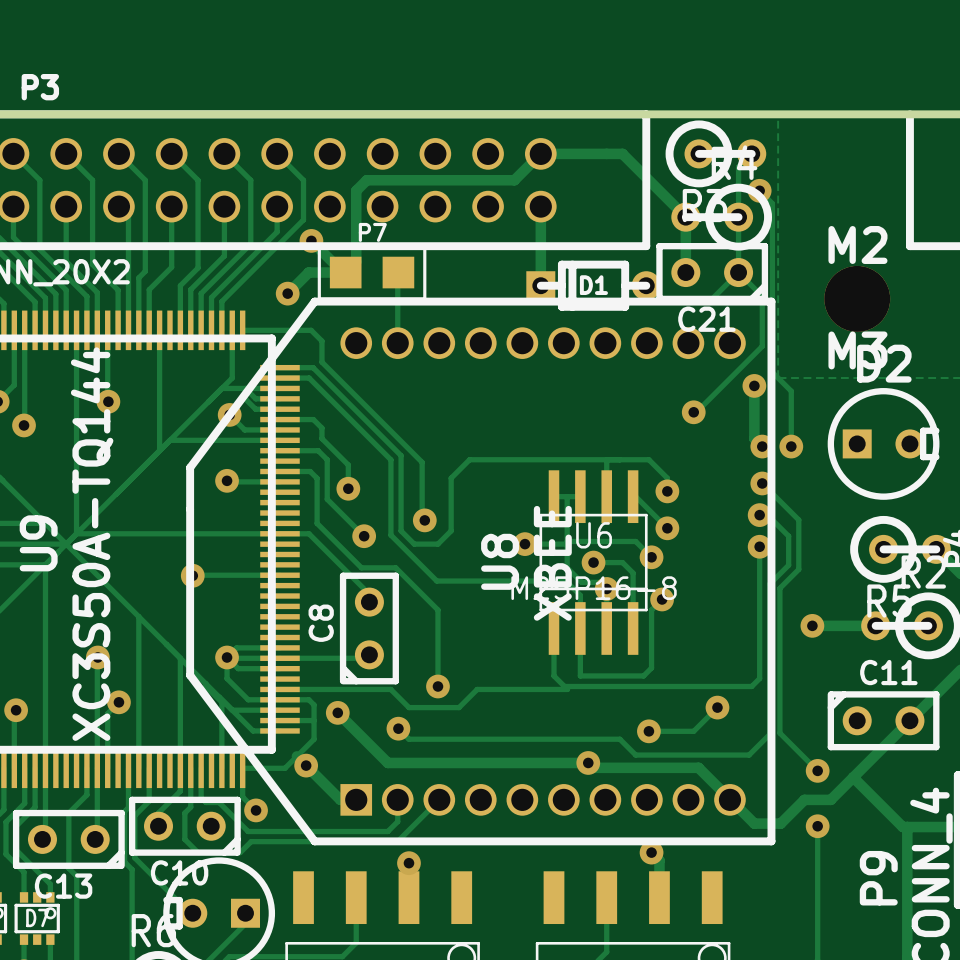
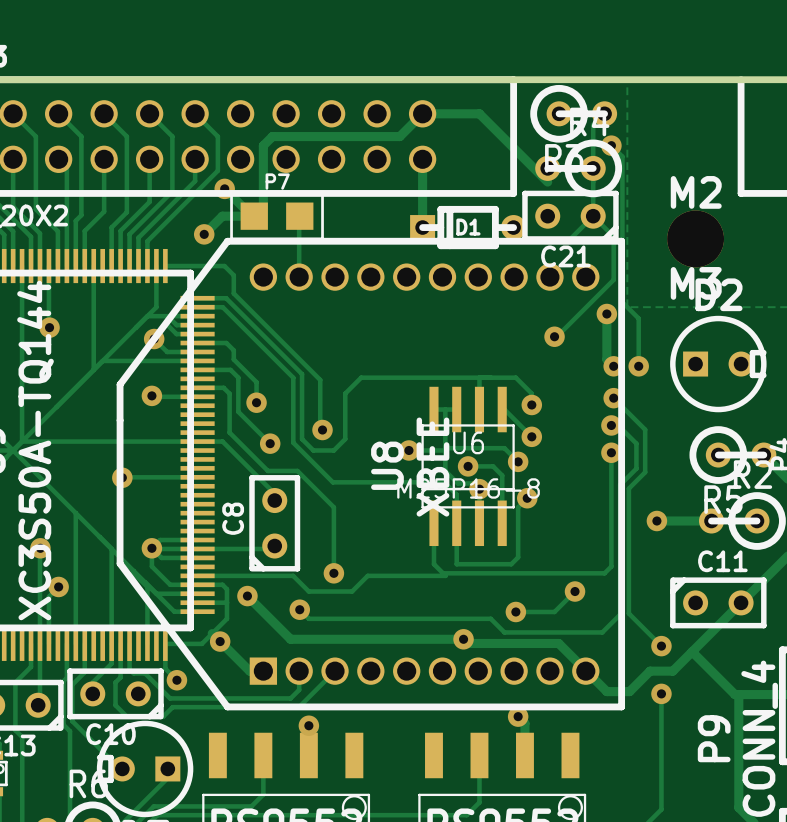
track: (606, 153) (622, 153) (685, 217) (685, 272) -> (479, 113) (547, 182)

